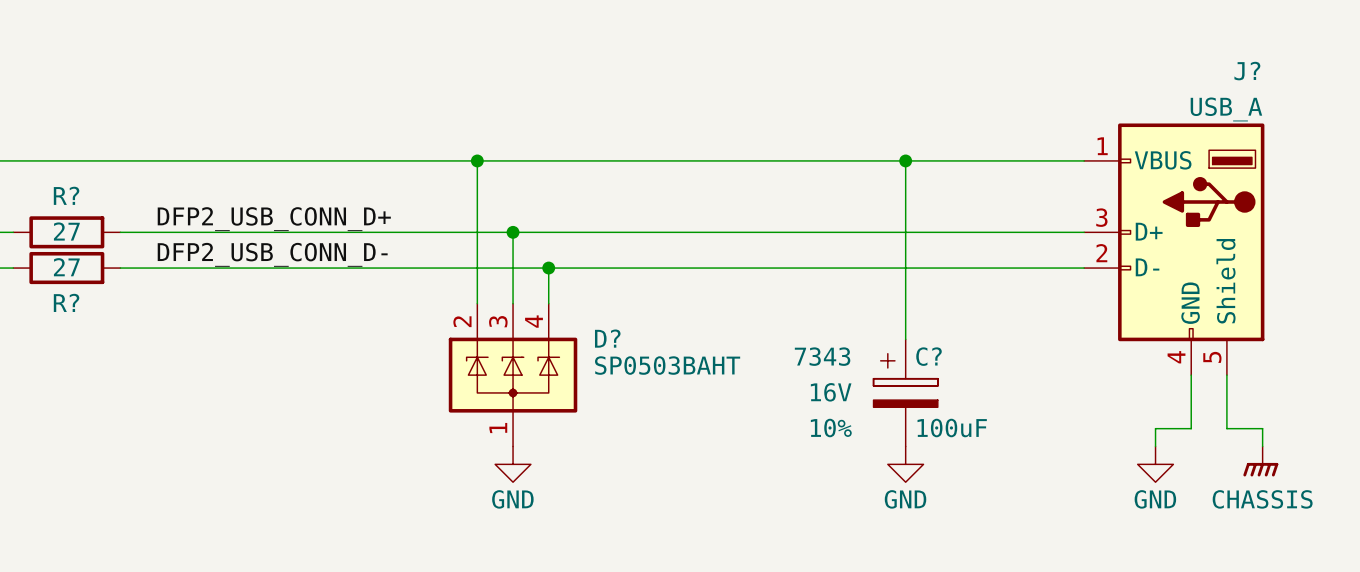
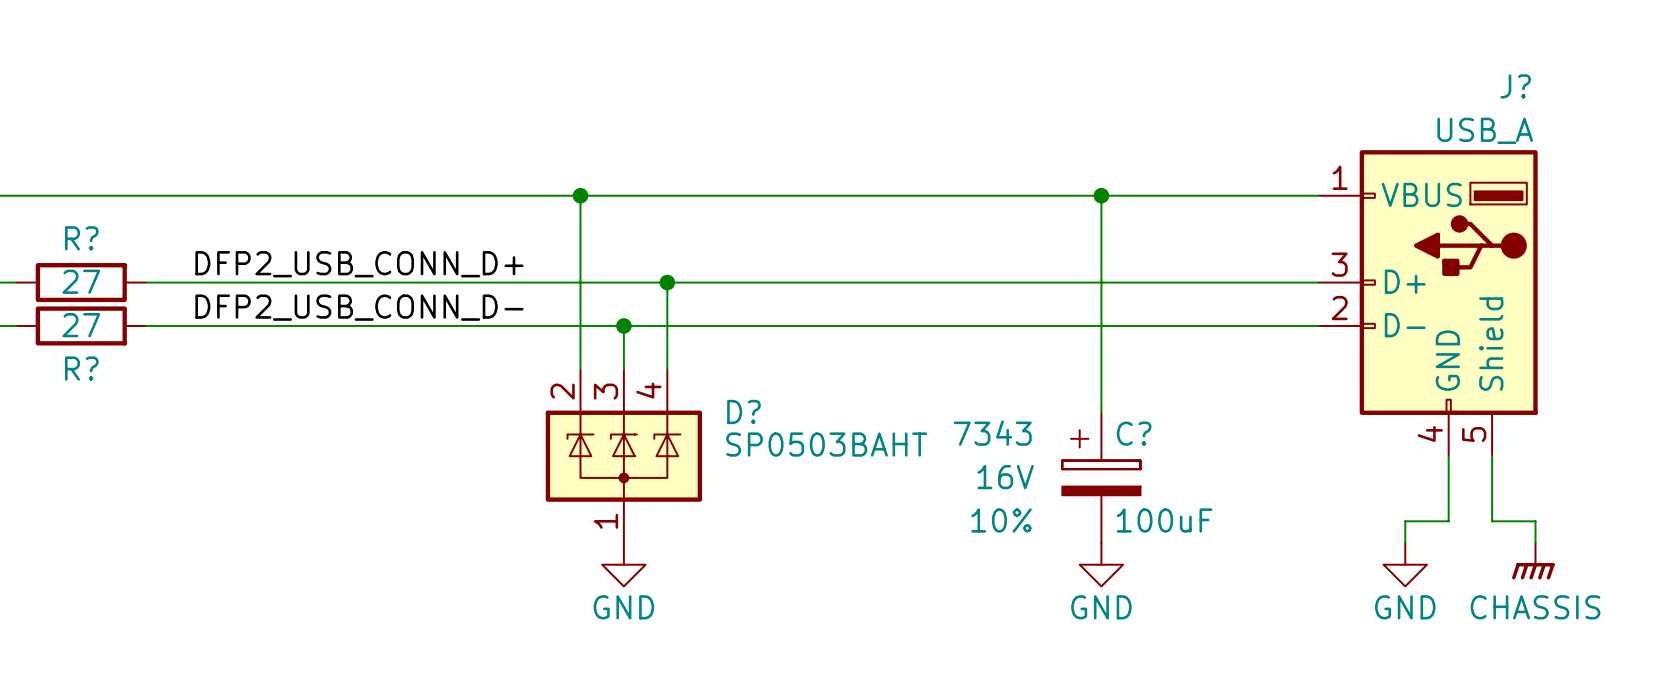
wire: (513, 232) (513, 268) -> (667, 282) (667, 325)
junction: (513, 232) -> none
junction: none -> (667, 282)
junction: none -> (623, 325)
junction: (548, 268) -> none

